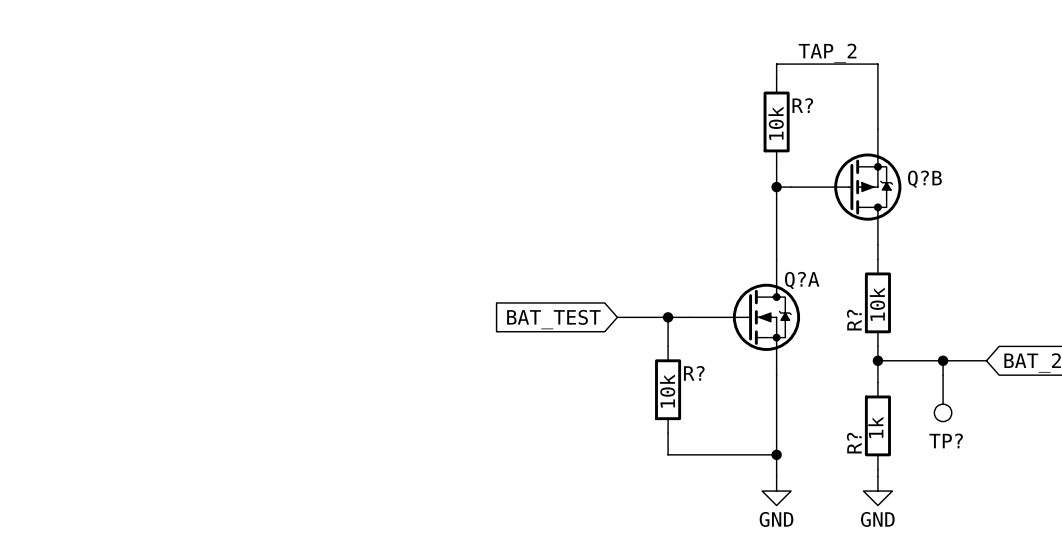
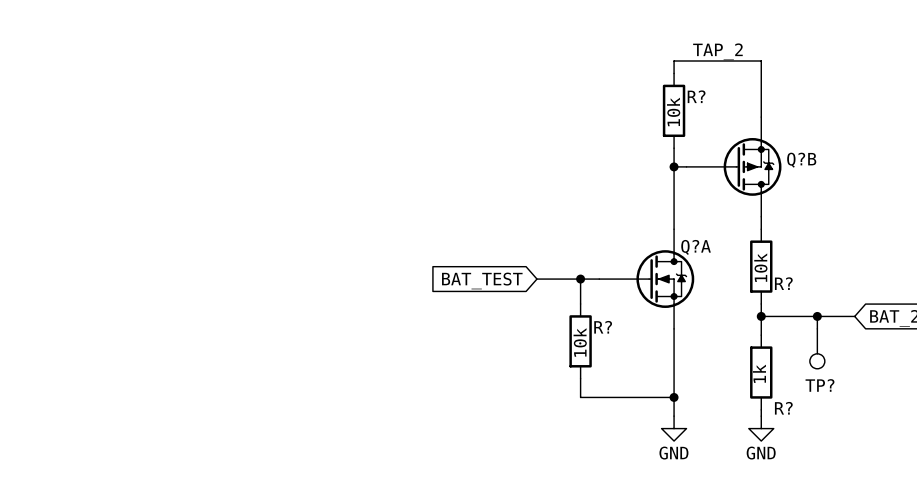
R? name rotation: 0° (854, 320) -> 90° clockwise (783, 283)
R? name position: R? (854, 320) -> R? (783, 283)
R? name rotation: 0° (854, 443) -> 90° clockwise (783, 408)
R? name position: R? (854, 443) -> R? (783, 408)

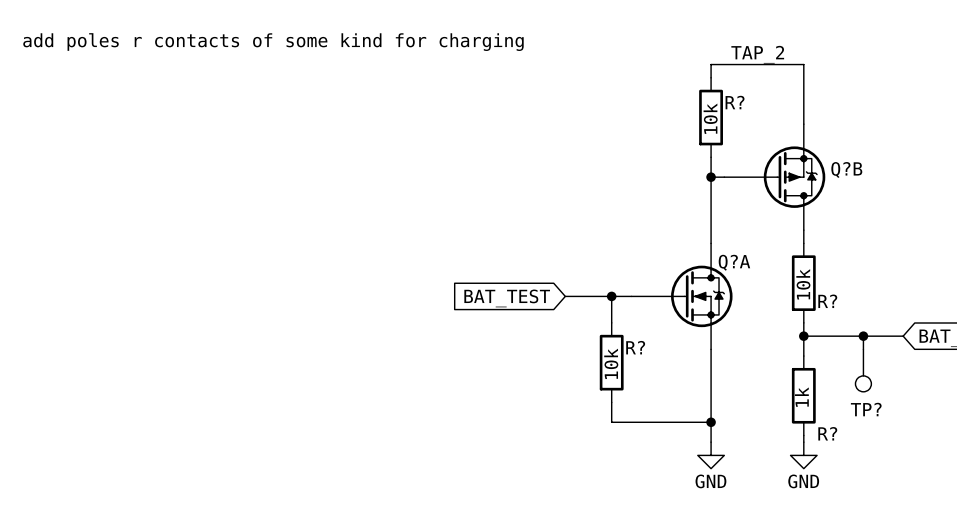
text: none -> add poles r contacts of some kind for charging (273, 42)

